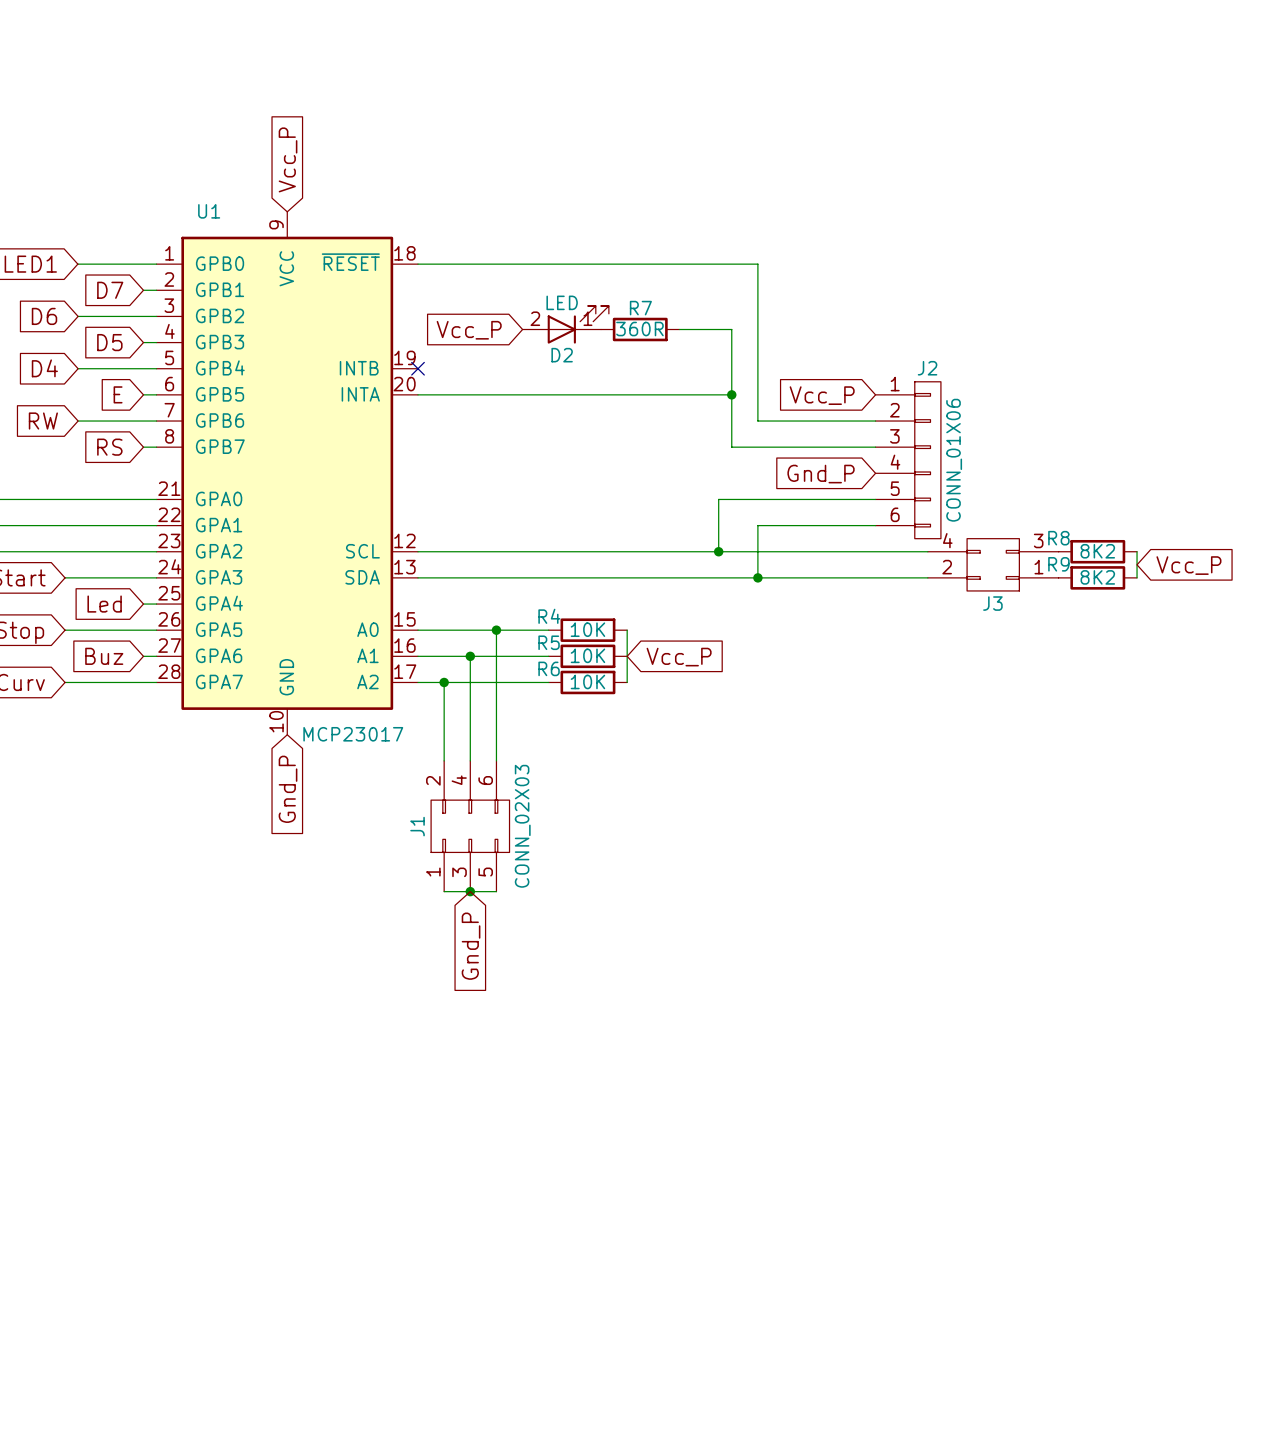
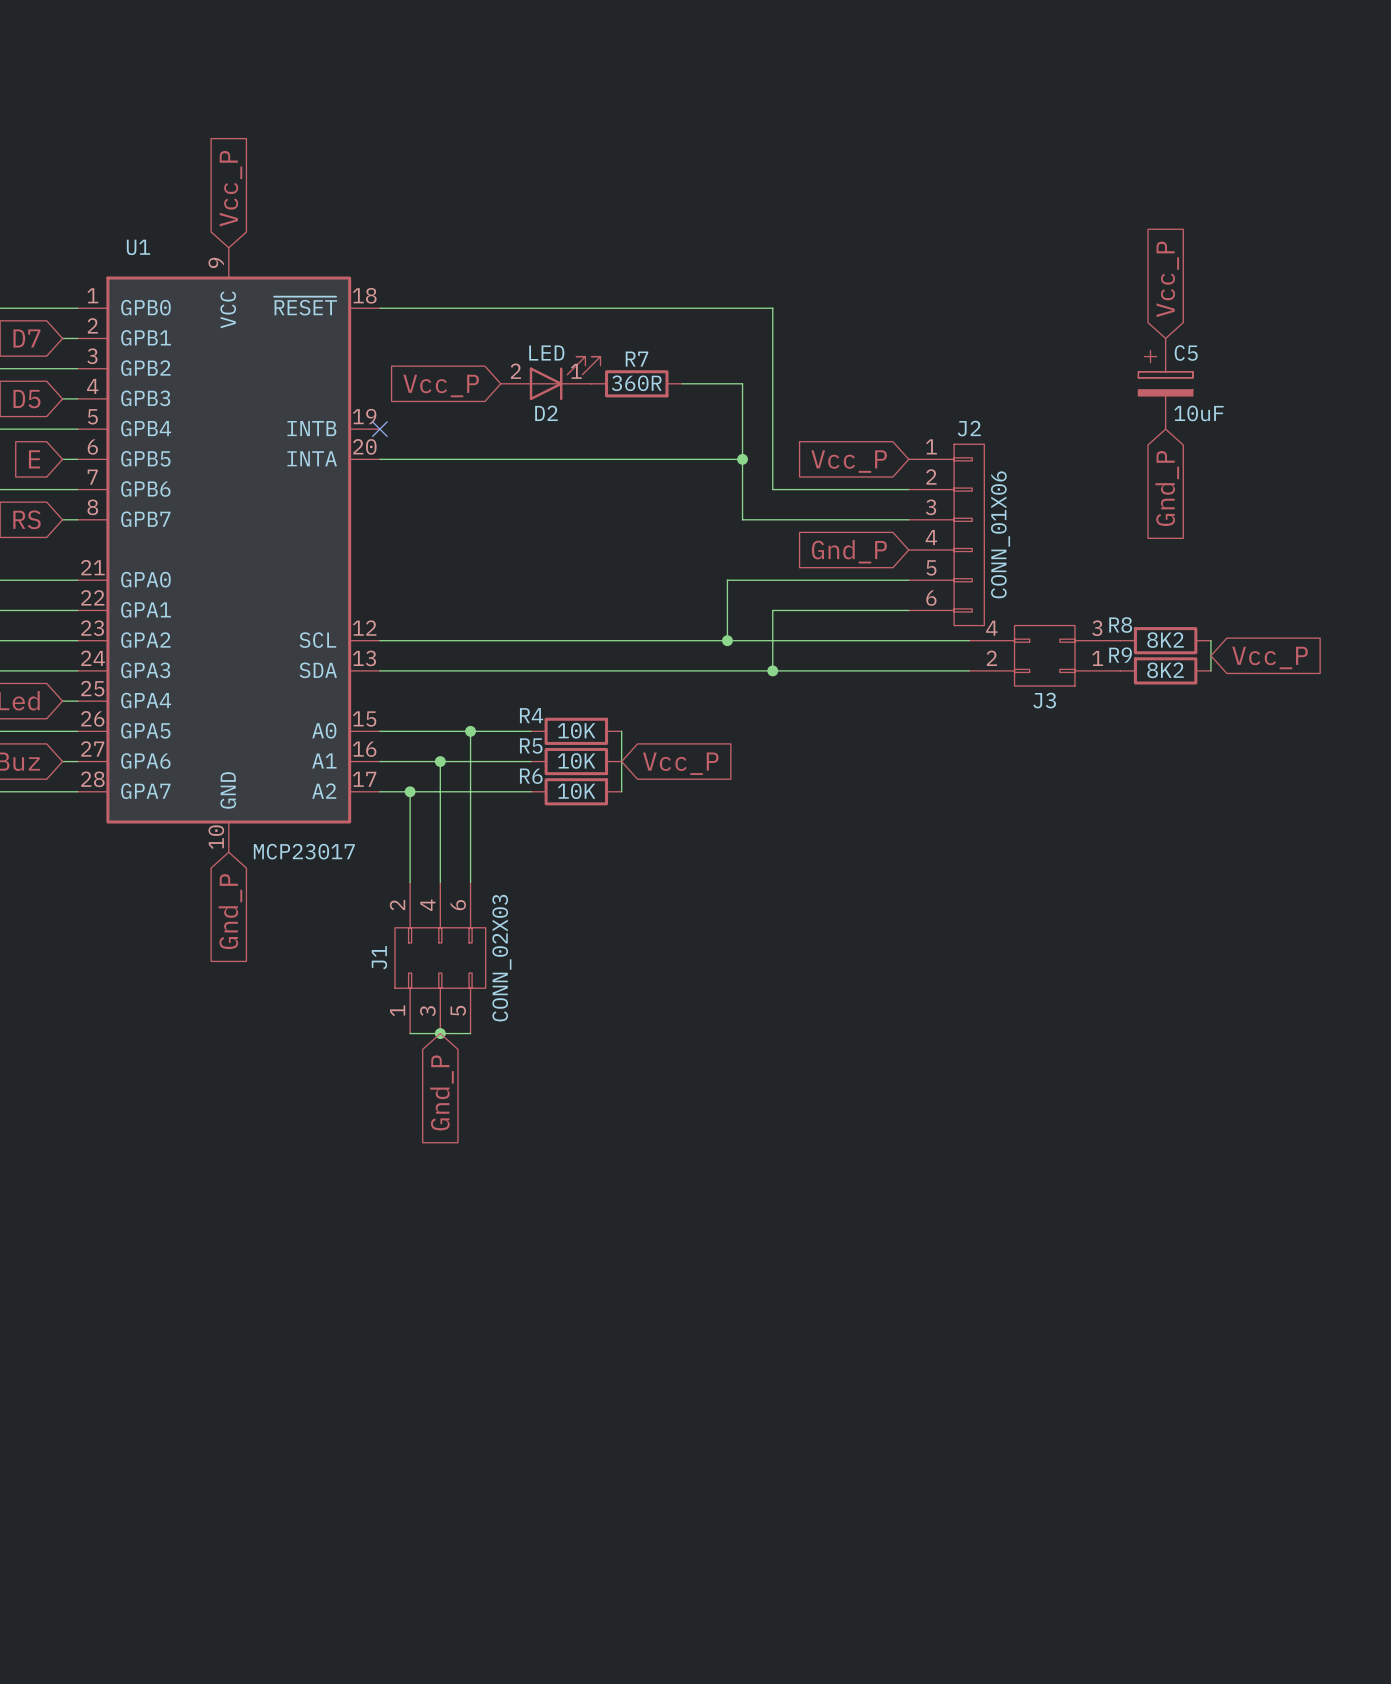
global label: none -> Vcc_P (1167, 279)
C5: none -> 10uF (1165, 383)
global label: none -> Gnd_P (1167, 488)

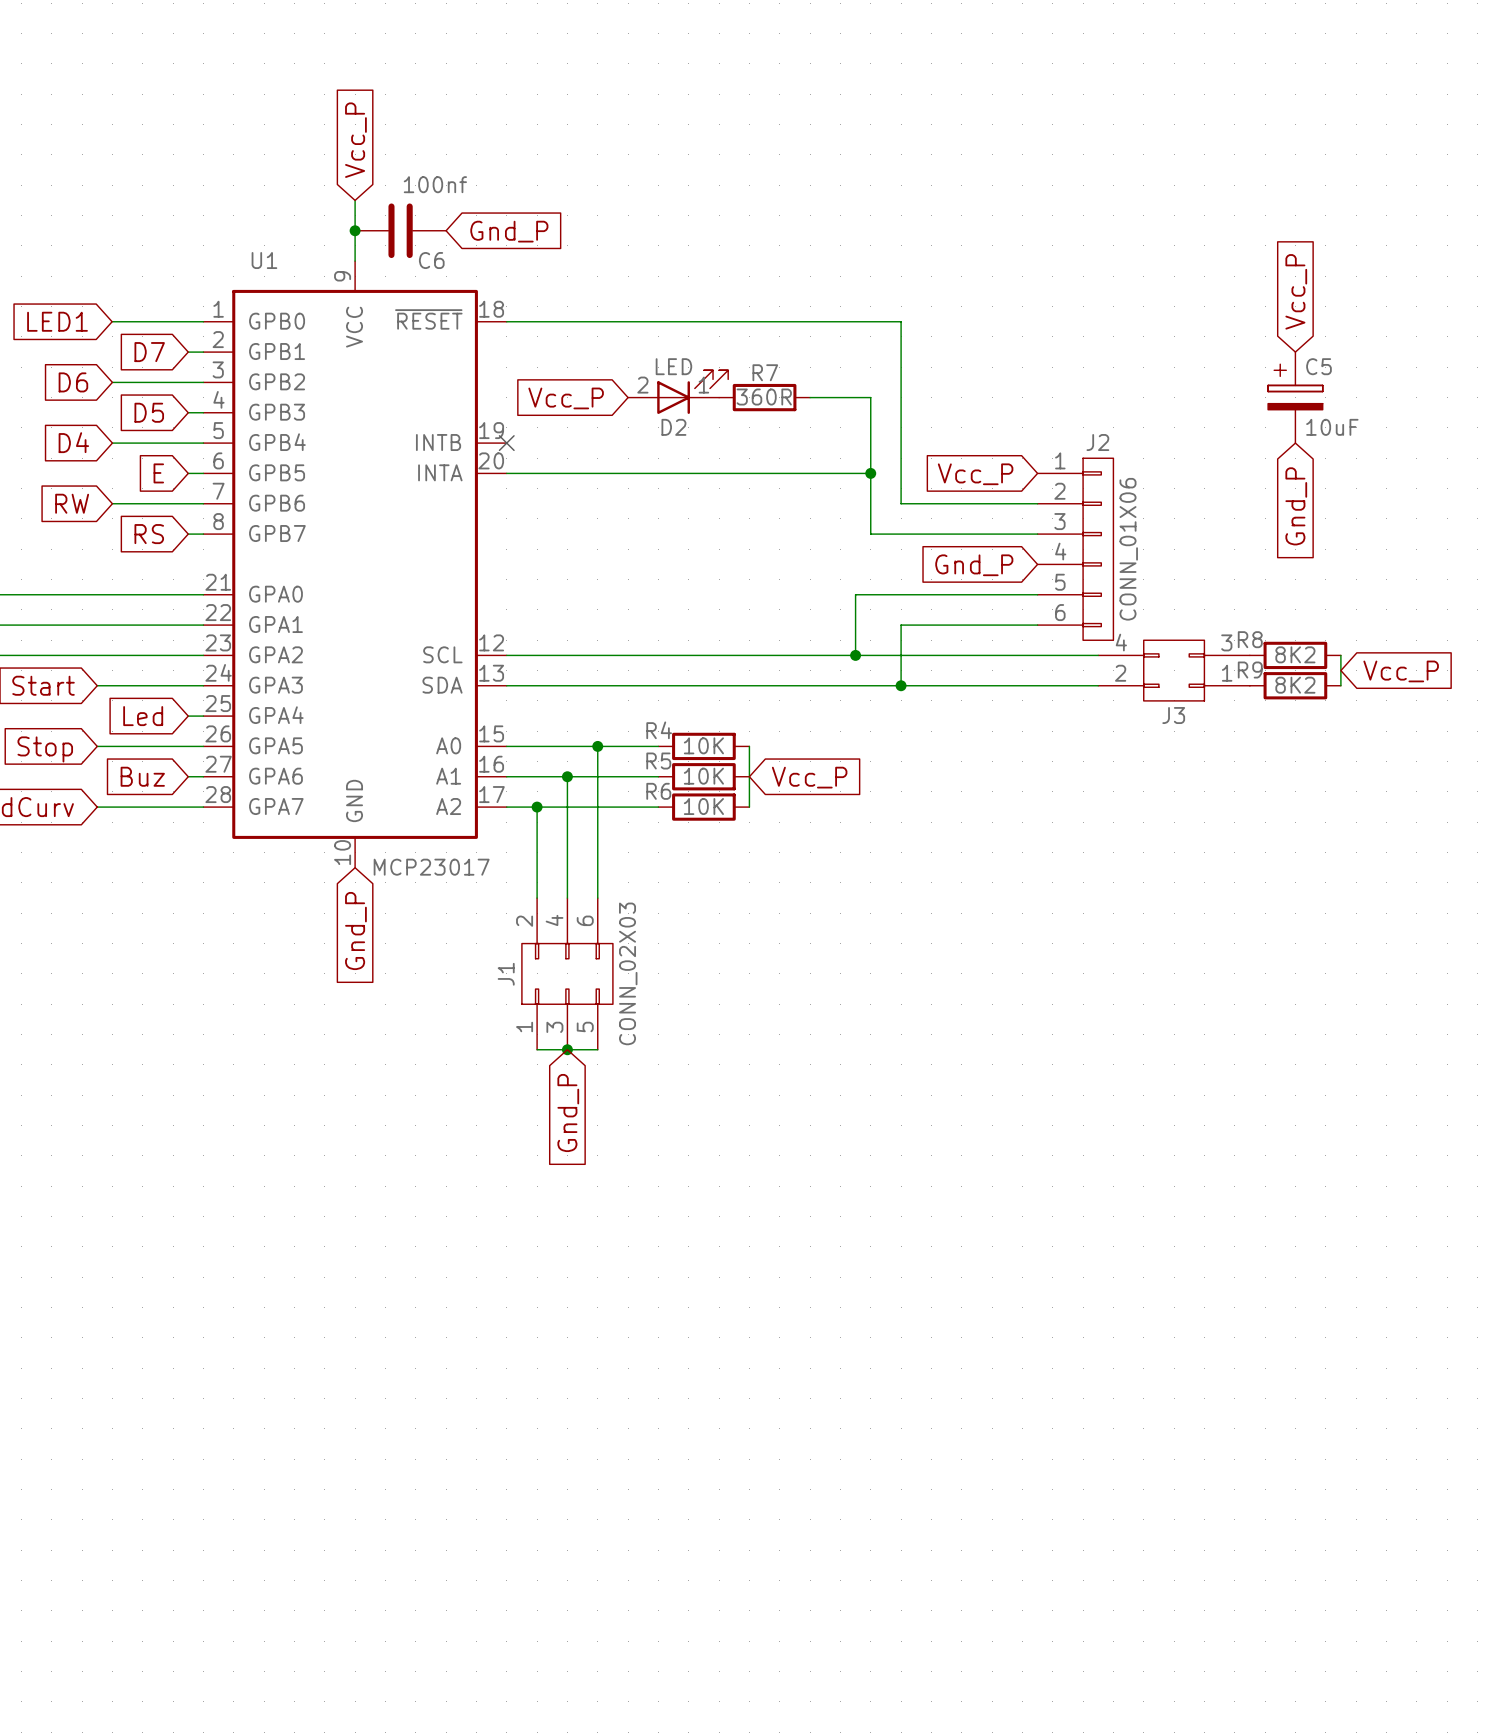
wire: none -> (355, 200) (355, 261)
global label position: Vcc_P (230, 188) -> Vcc_P (355, 140)
junction: none -> (355, 230)
C6: none -> 100nf (400, 230)
global label: none -> Gnd_P (509, 231)

